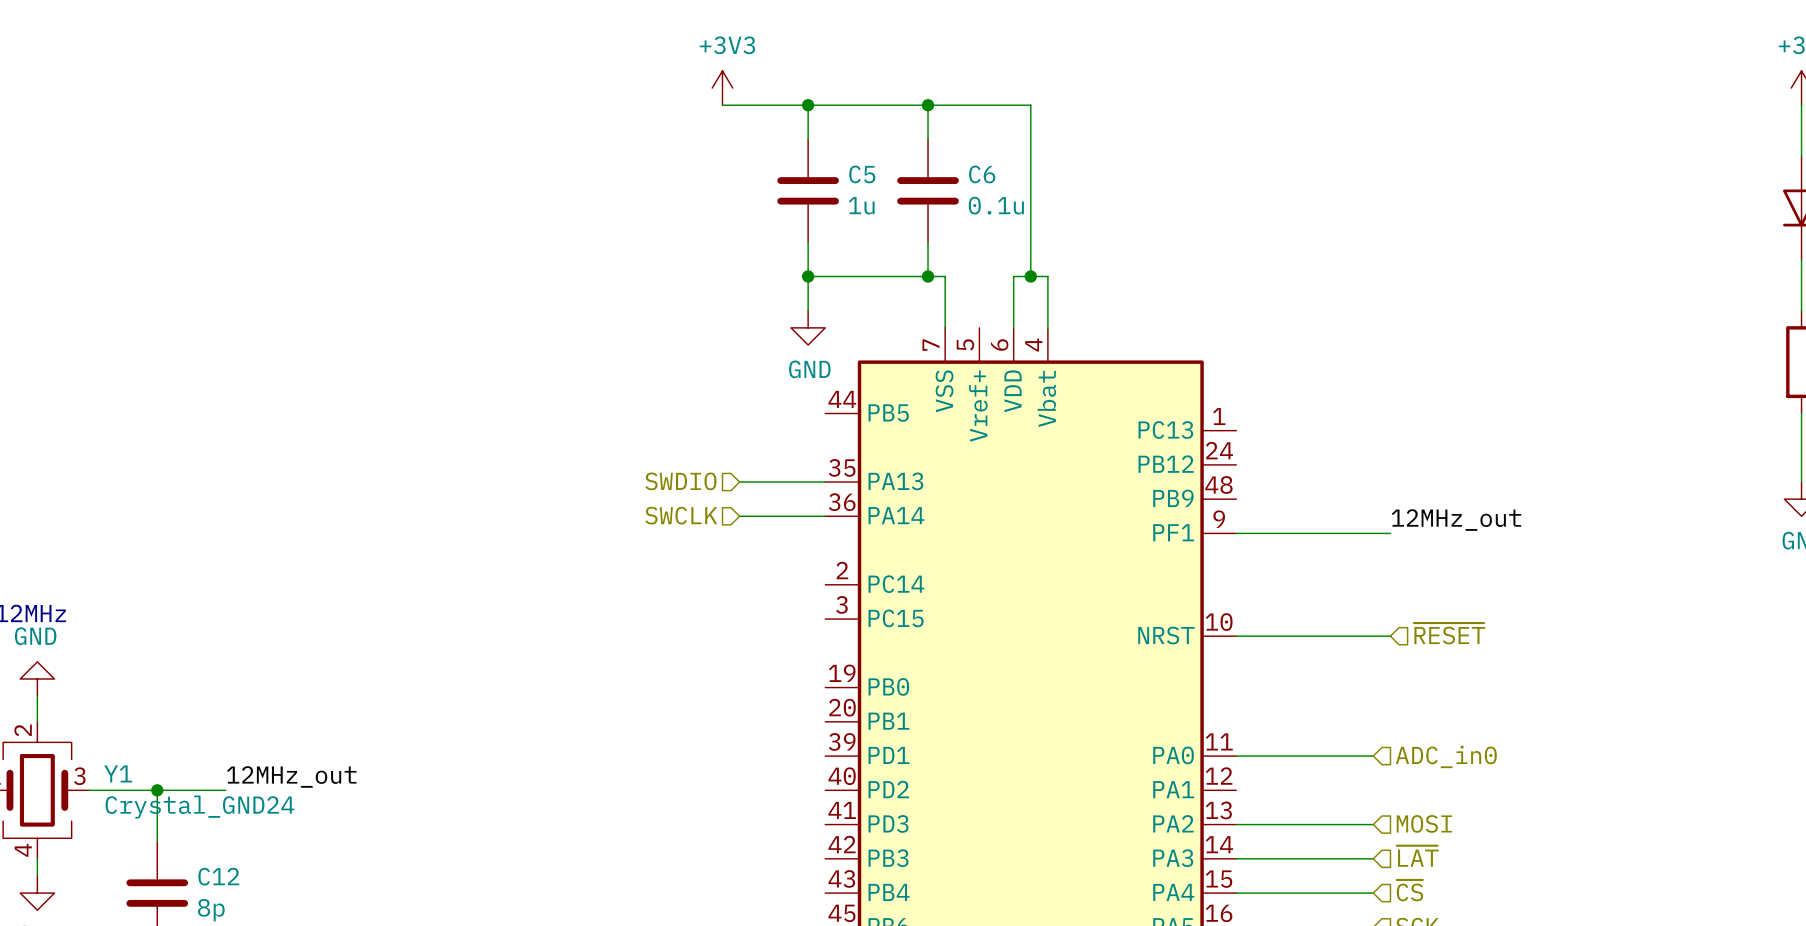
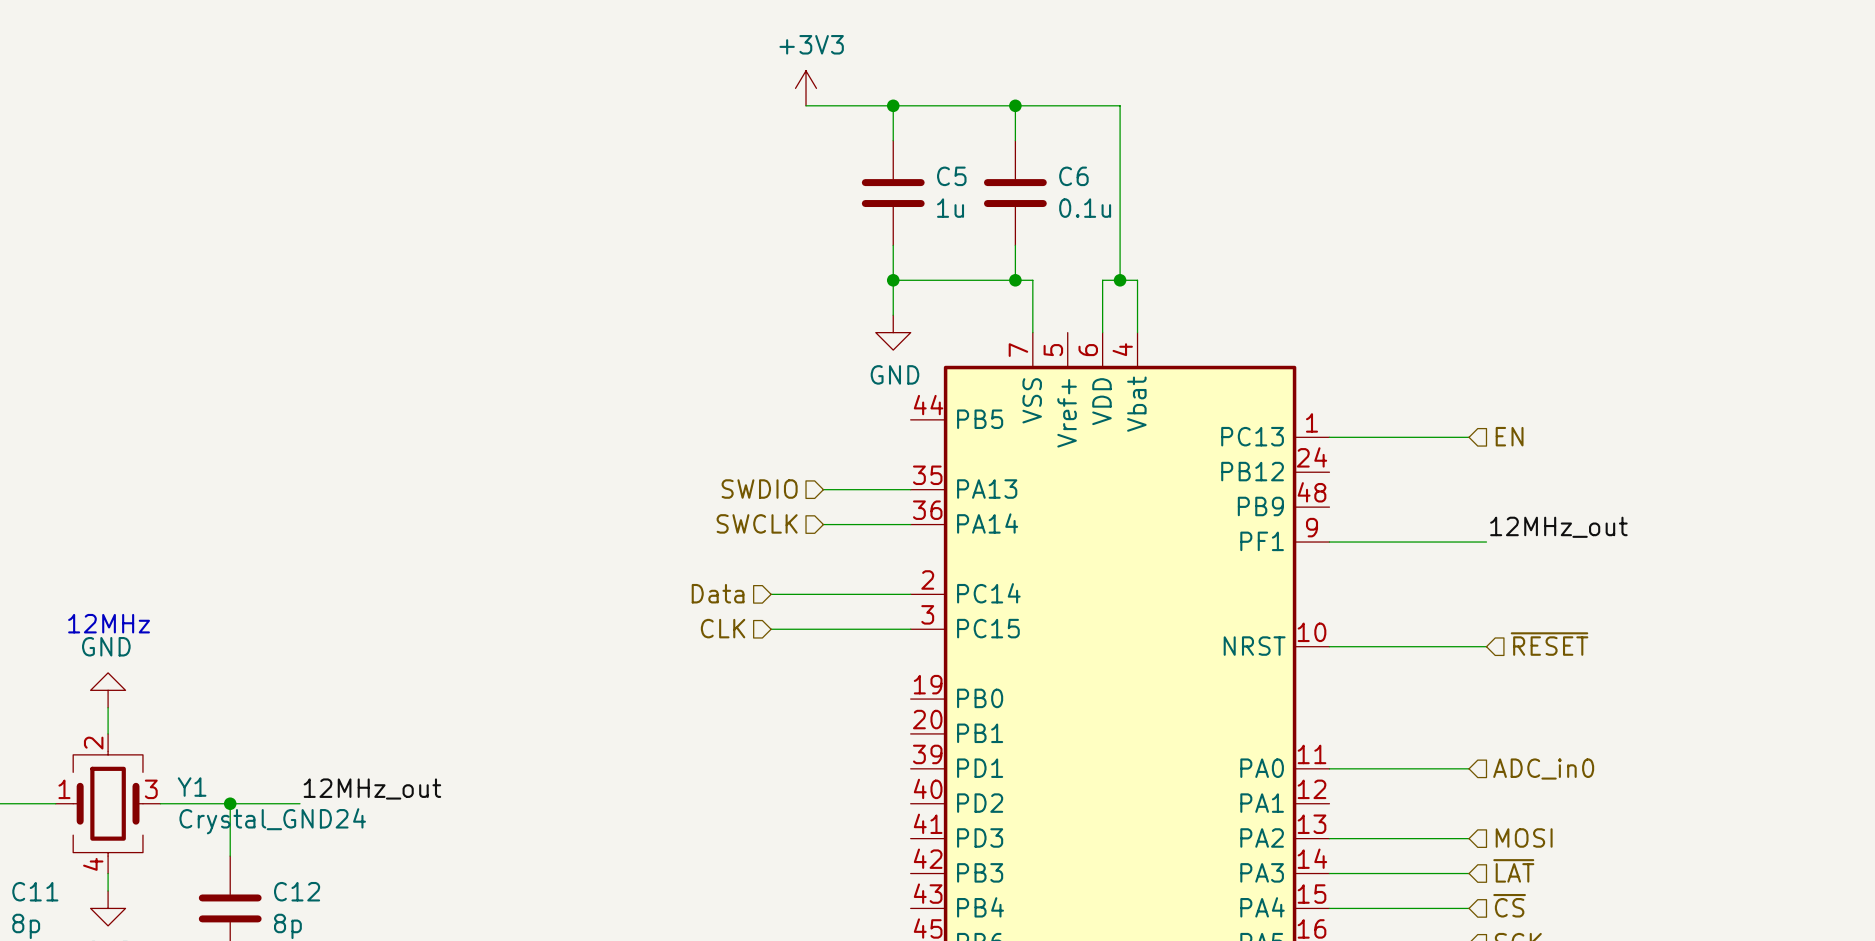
wire: none -> (1329, 437) (1469, 437)
hierarchical label: none -> EN (1509, 436)
hierarchical label: none -> Data (718, 593)
wire: none -> (771, 594) (910, 594)
hierarchical label: none -> CLK (723, 628)
wire: none -> (771, 629) (910, 629)

